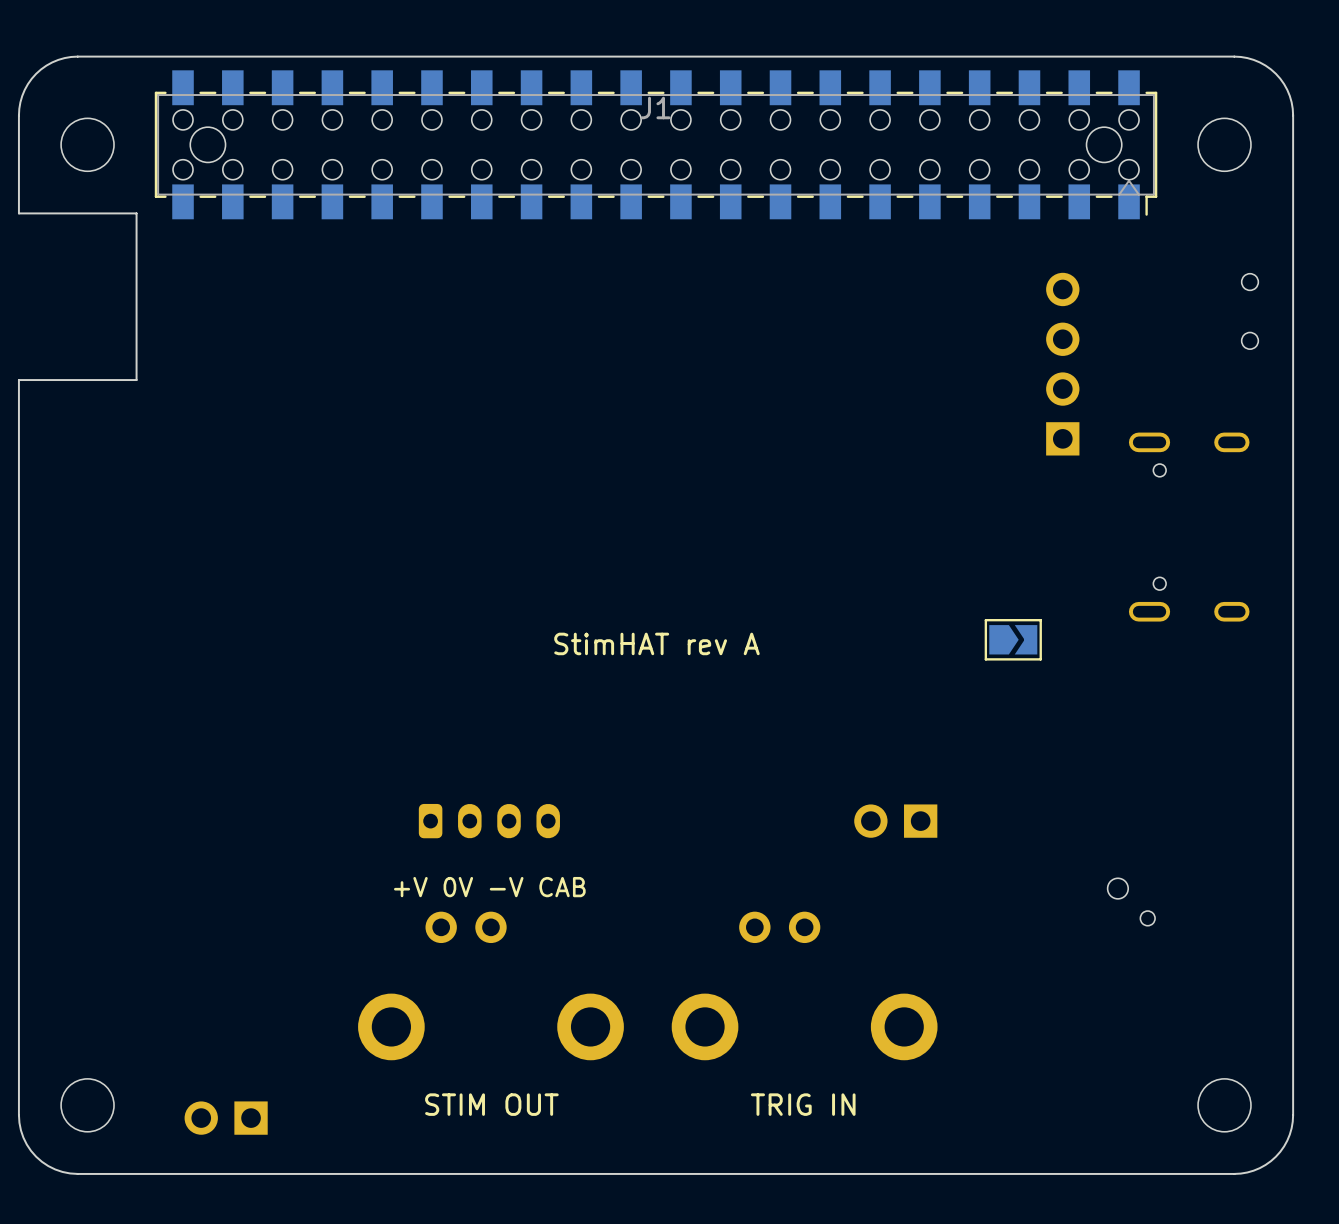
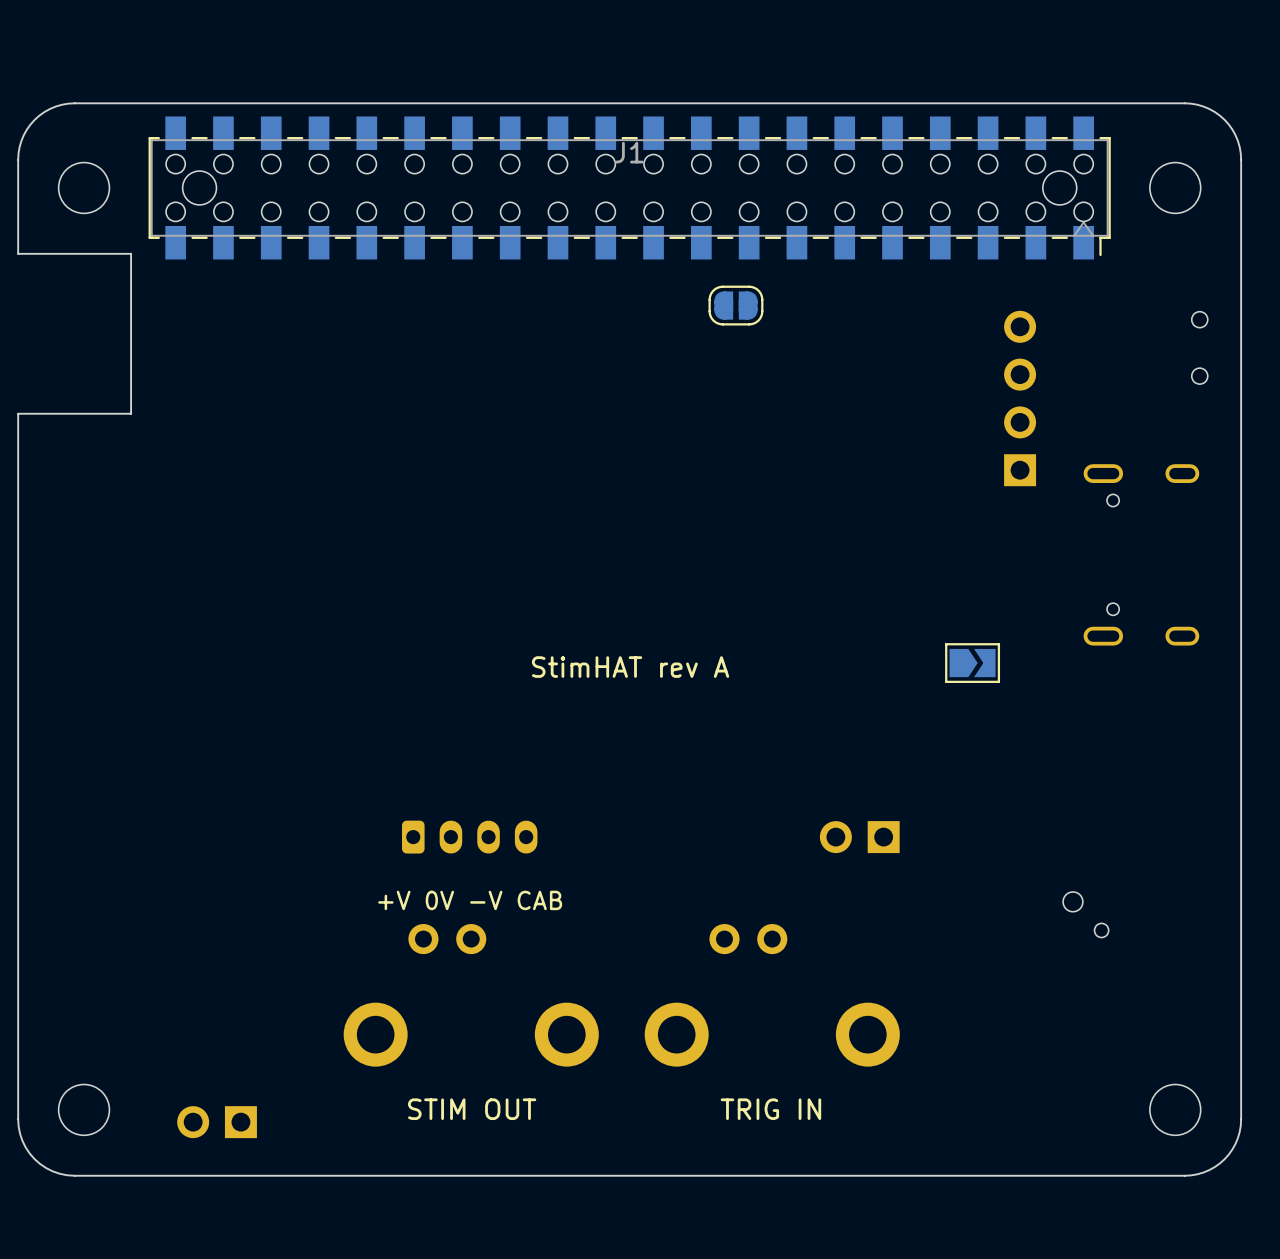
part: none -> (735, 305)

